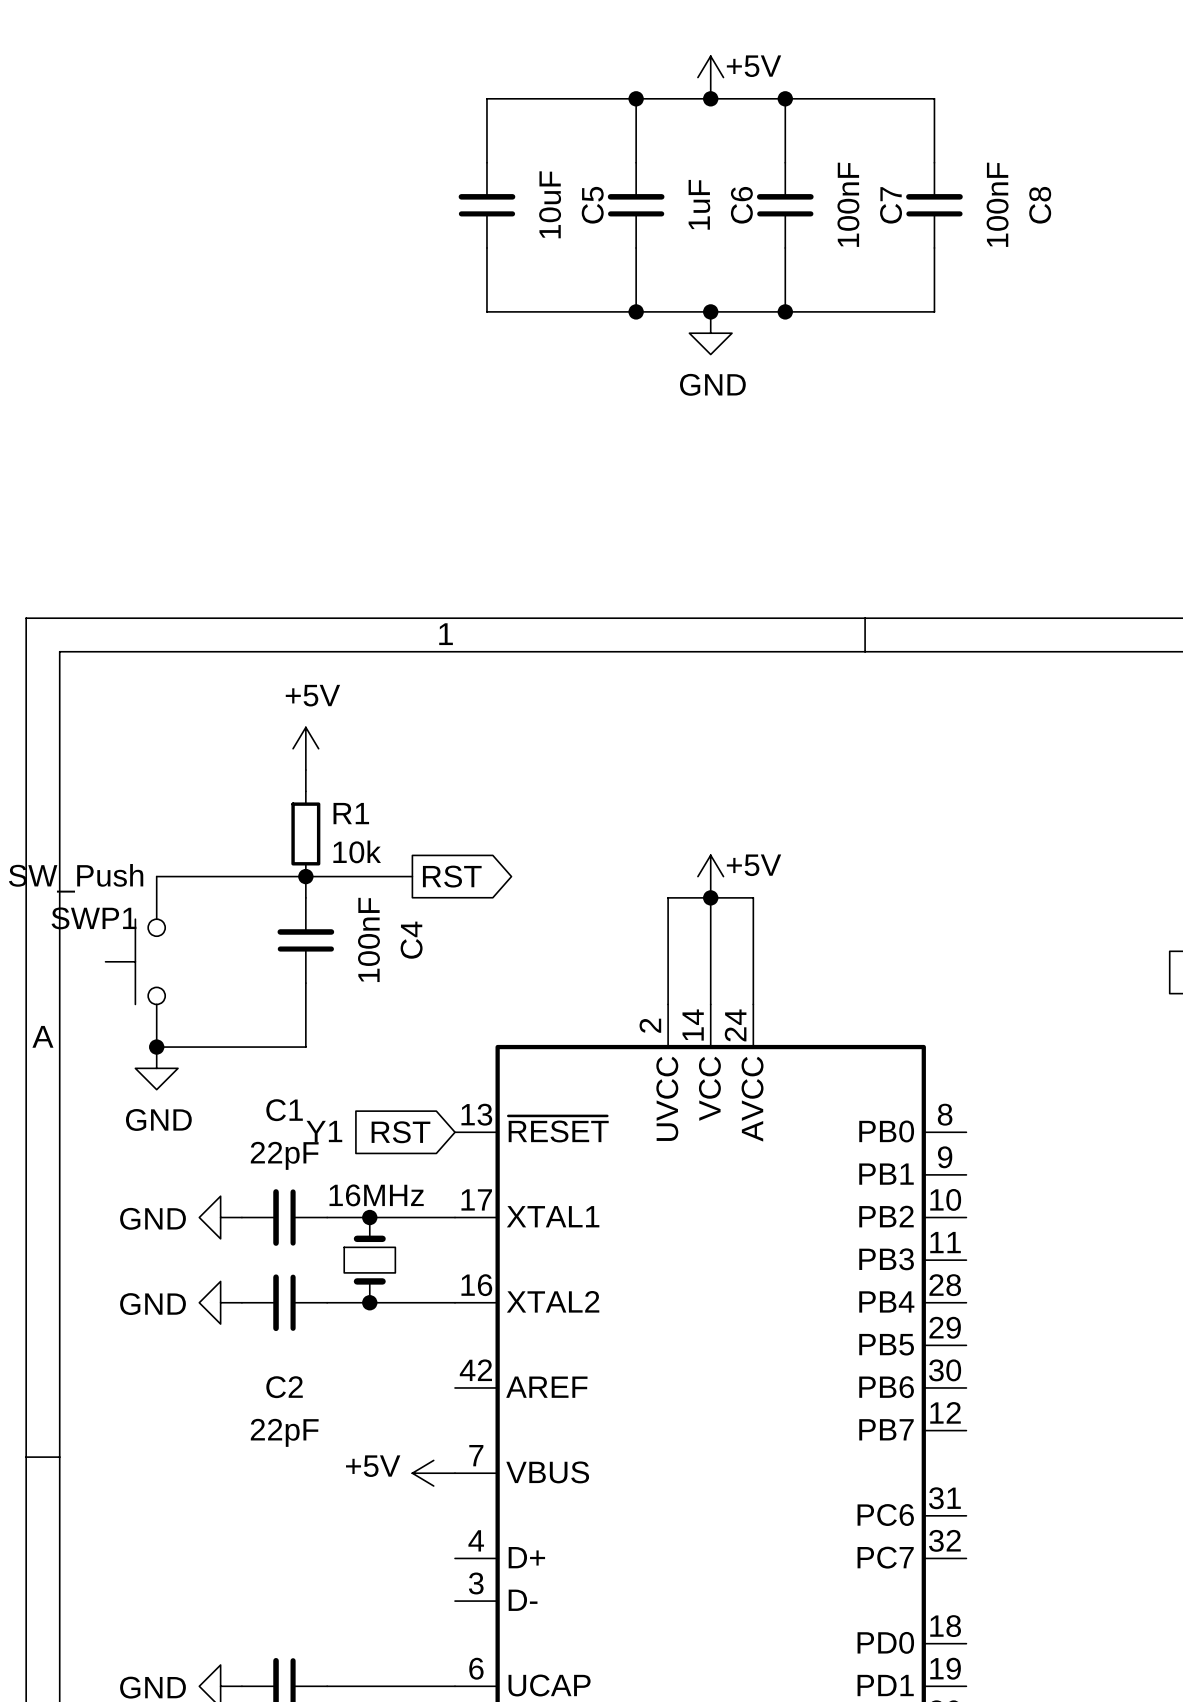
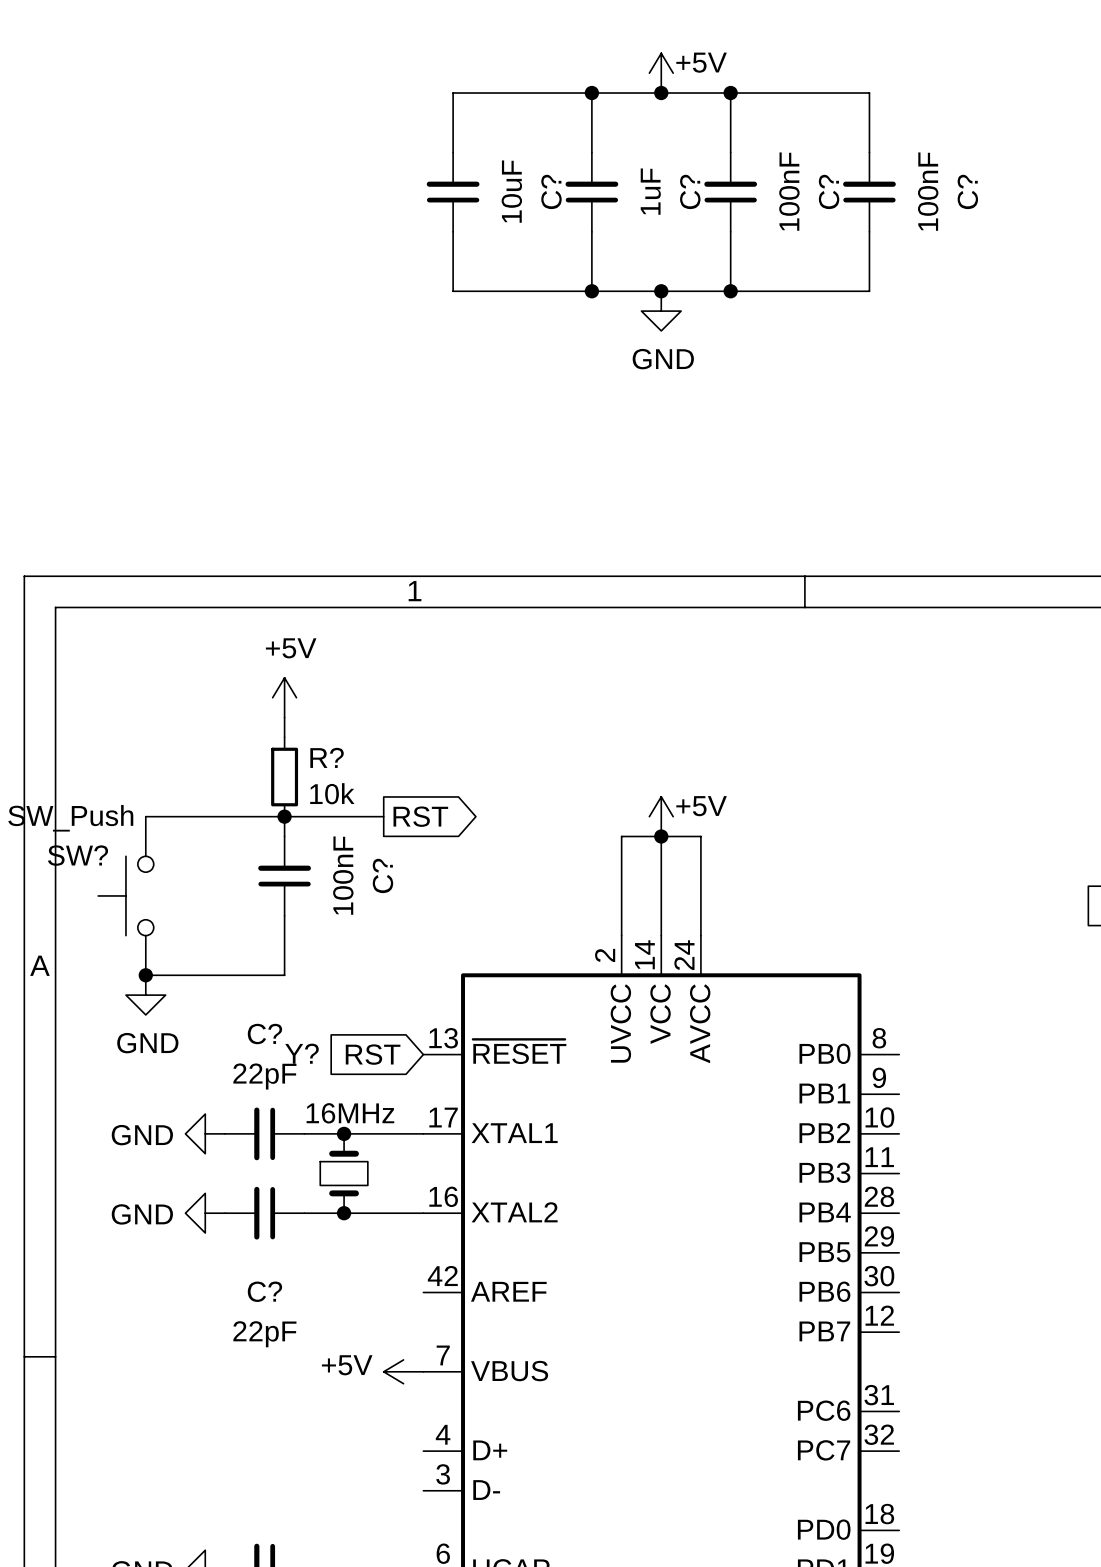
C5 name: C5 (592, 205) -> C? (551, 191)
C6 name: C6 (741, 205) -> C? (690, 191)
C7 name: C7 (891, 205) -> C? (829, 191)
C8 name: C8 (1040, 205) -> C? (967, 191)
R1 name: R1 (351, 813) -> R? (327, 757)
SWP1 name: SWP1 (93, 918) -> SW? (78, 855)
C4 name: C4 (411, 940) -> C? (382, 875)
C1 name: C1 (284, 1110) -> C? (264, 1034)
Y1 name: Y1 (324, 1131) -> Y? (301, 1053)
C2 name: C2 (284, 1387) -> C? (264, 1291)

